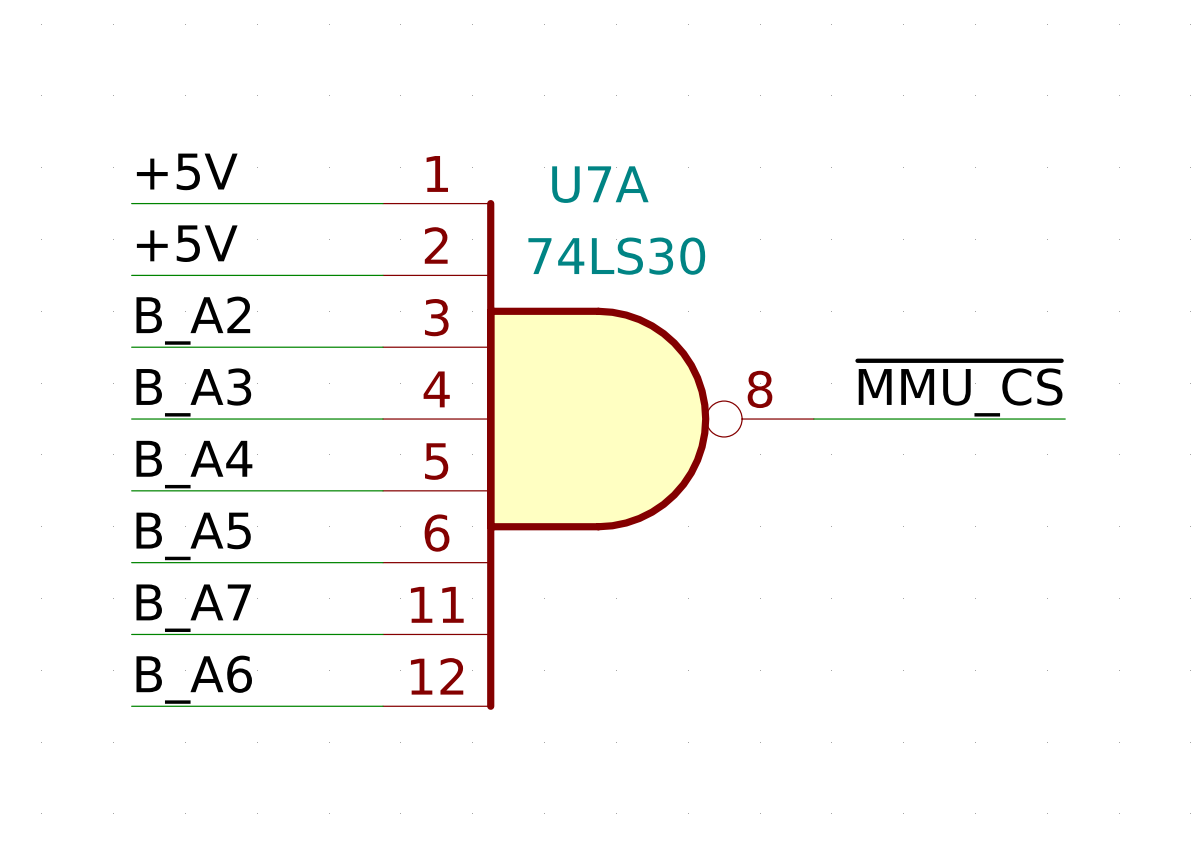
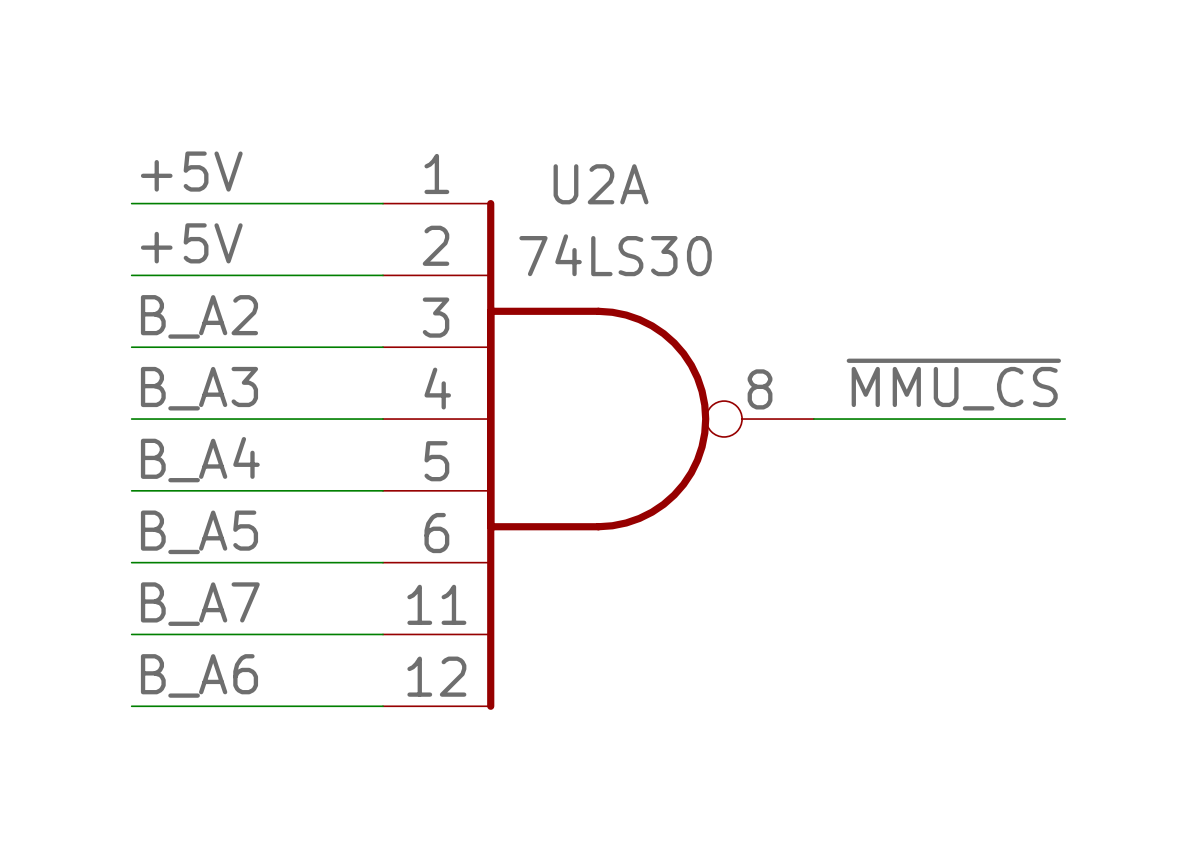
U7A name: U7A (600, 184) -> U2A (601, 184)

